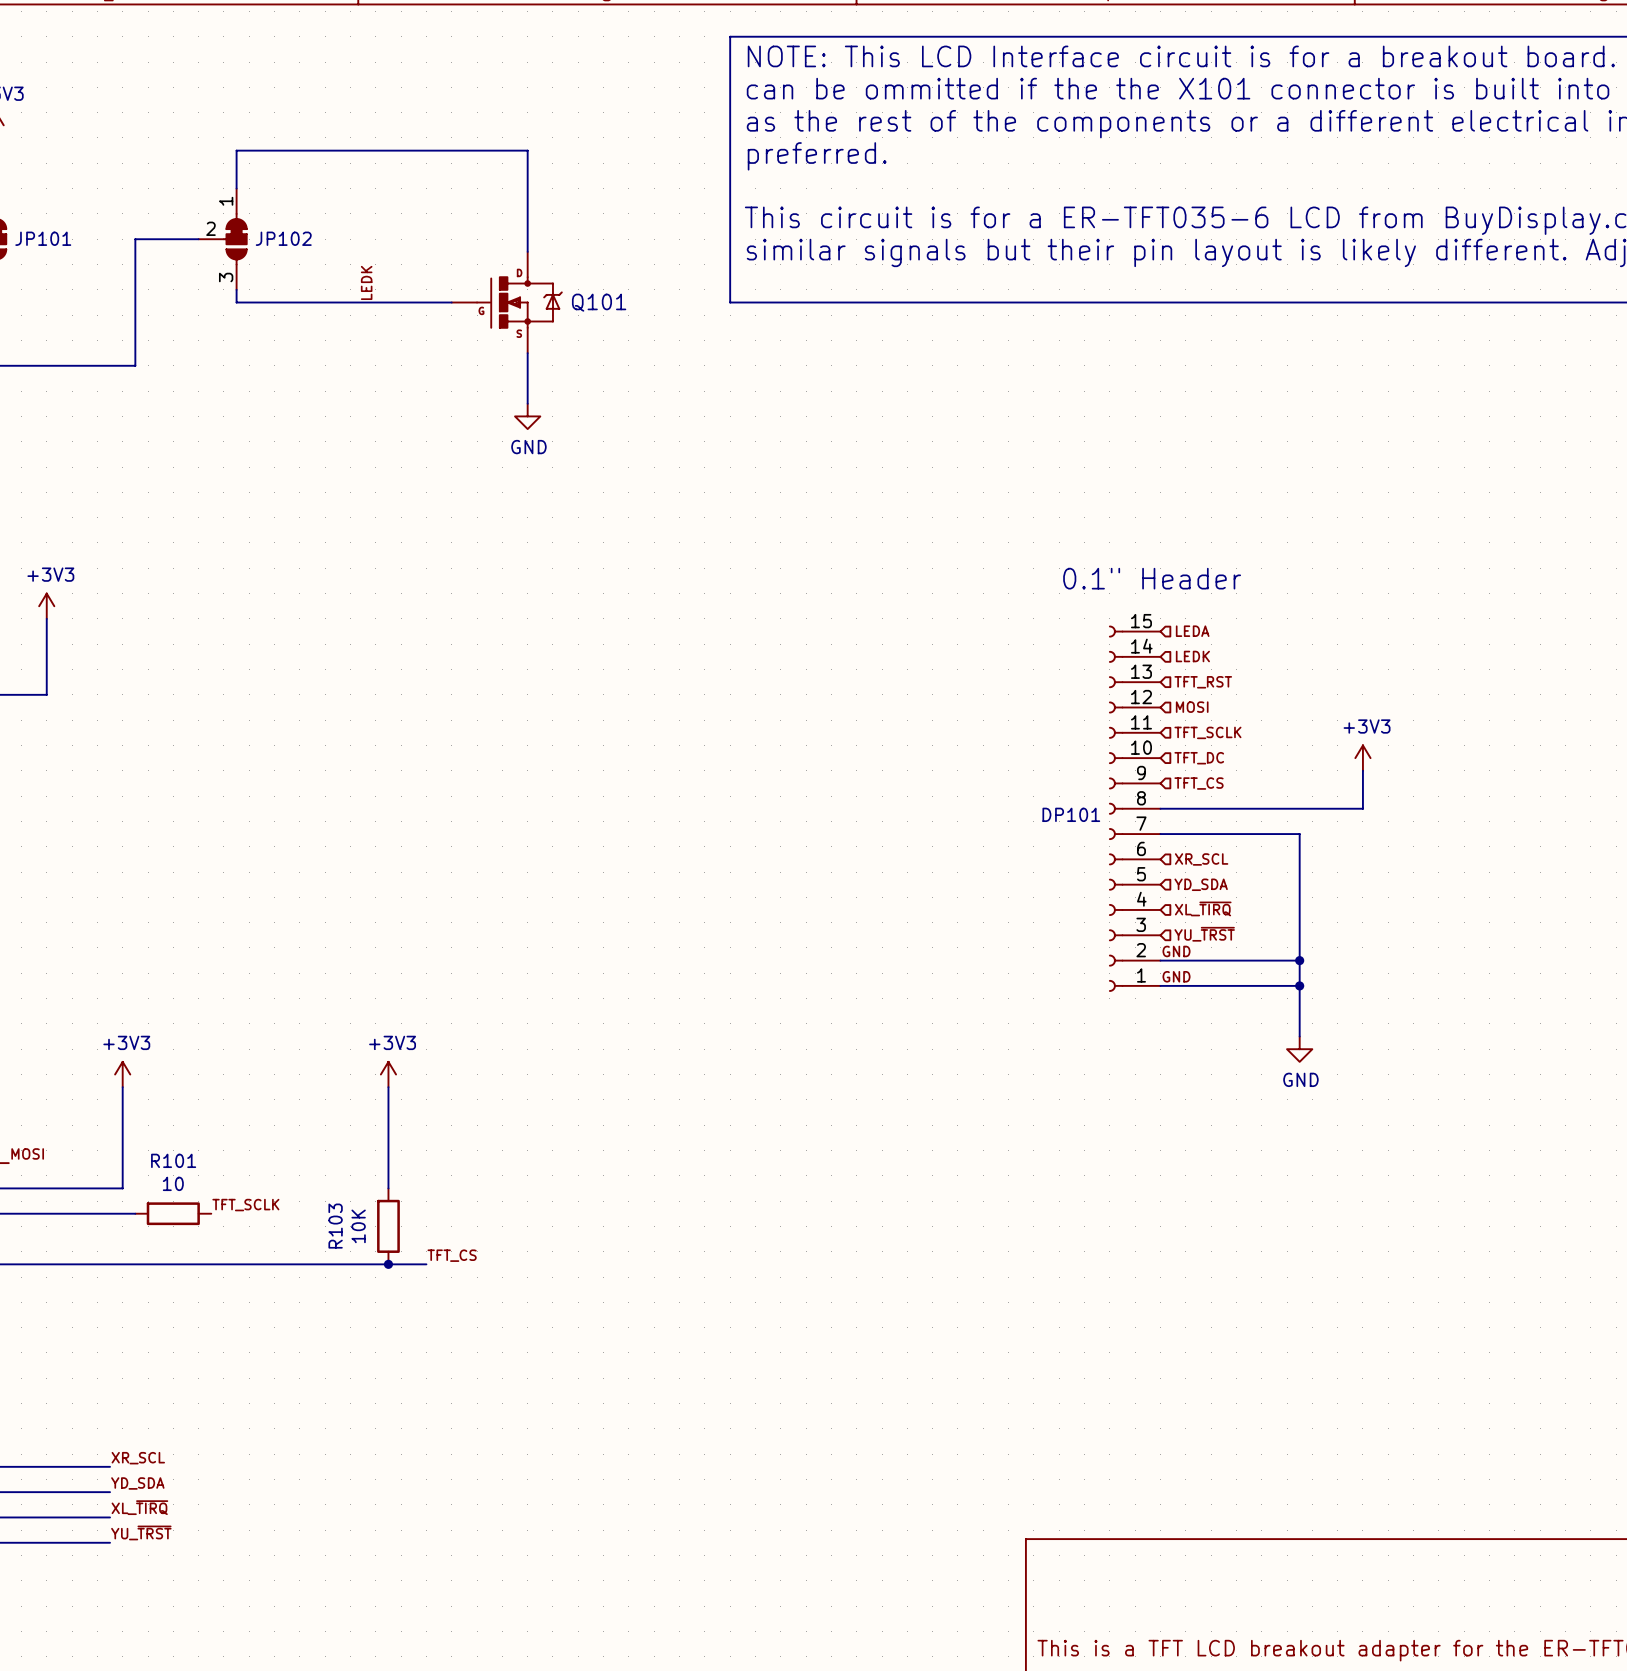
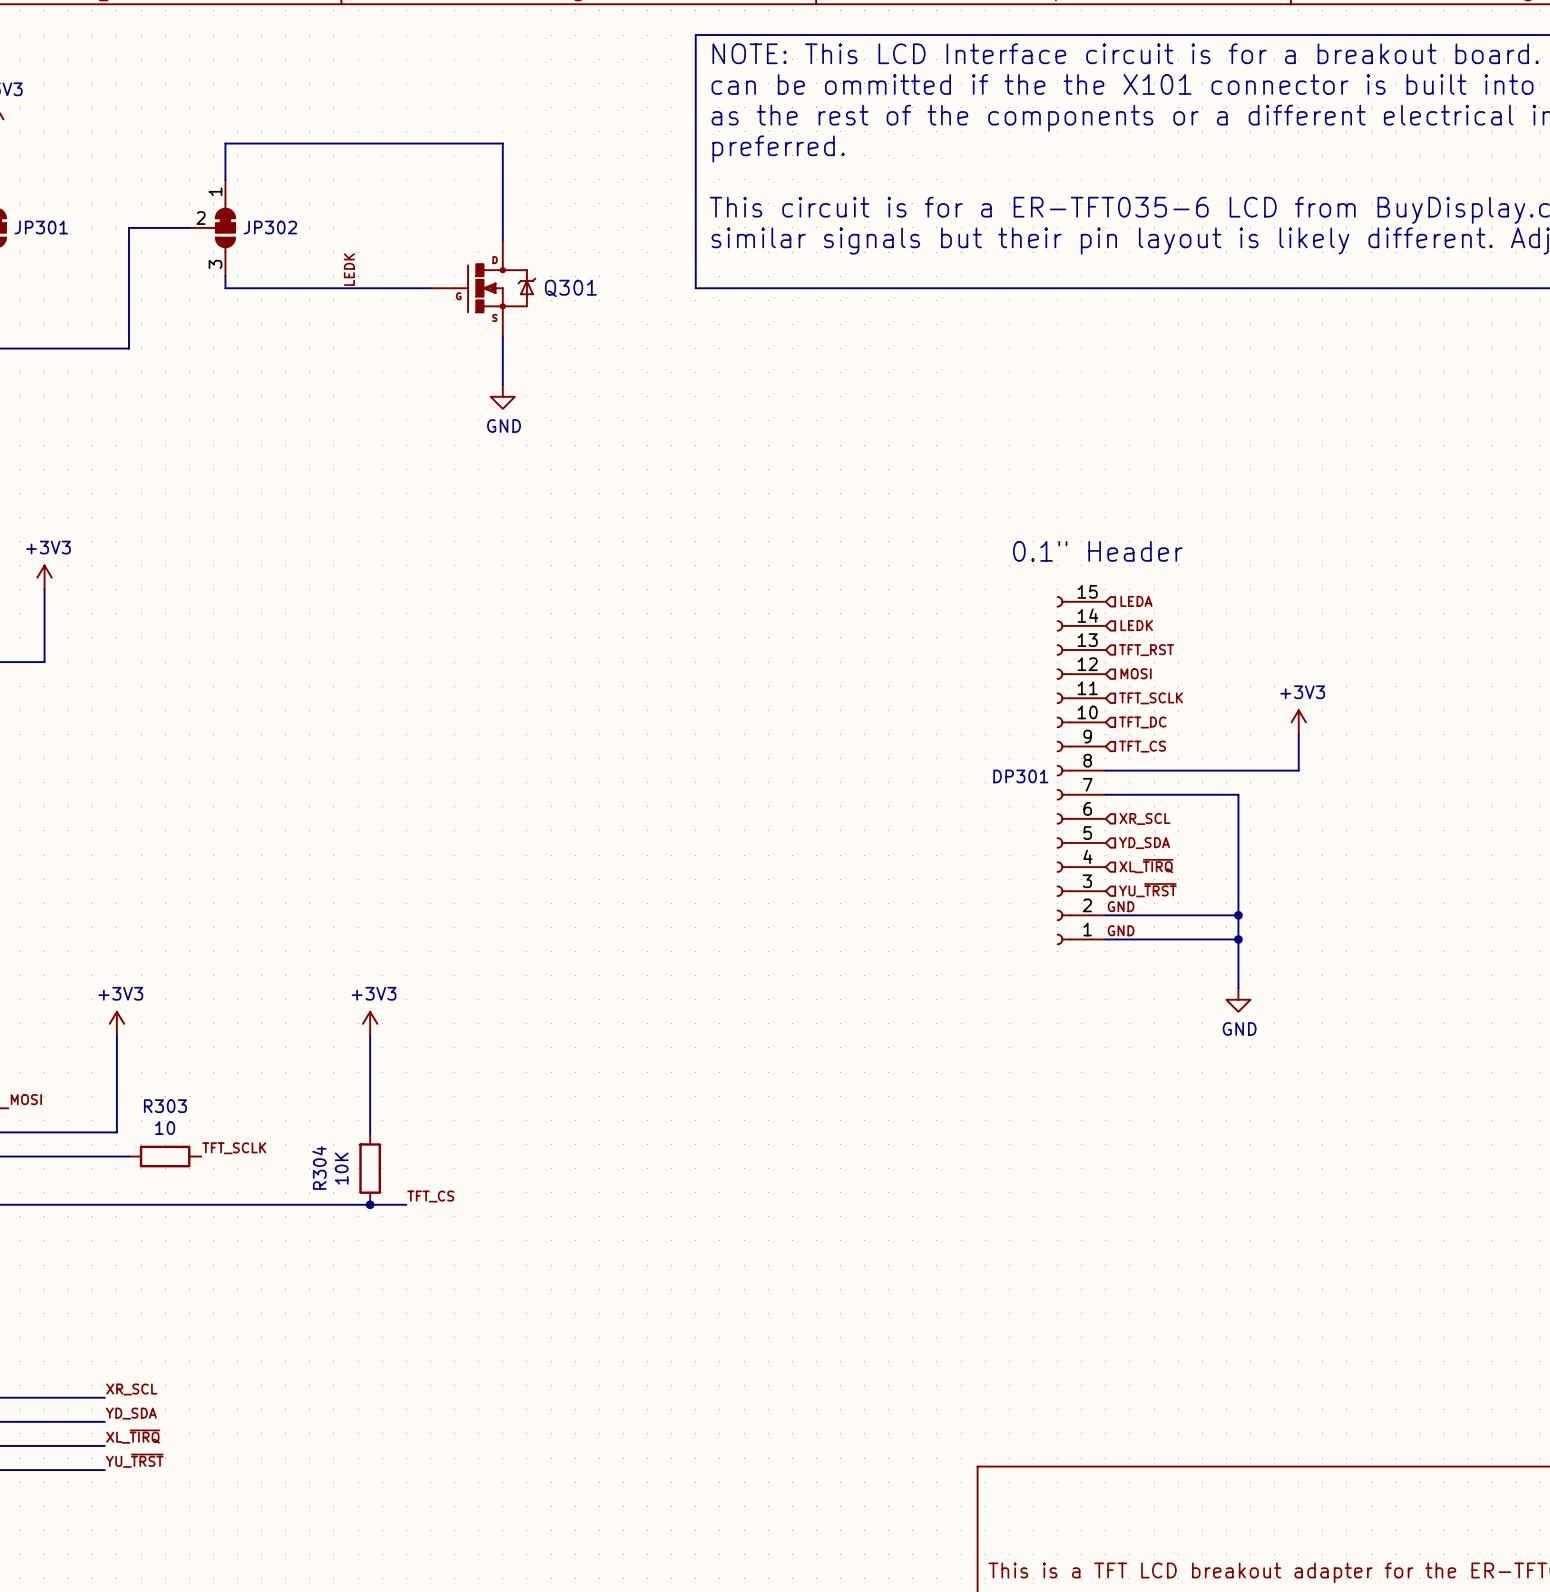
JP101 name: JP101 (43, 238) -> JP301 (41, 227)
JP102 name: JP102 (283, 238) -> JP302 (270, 227)
Q101 name: Q101 (599, 302) -> Q301 (570, 288)
DP101 name: DP101 (1071, 814) -> DP301 (1020, 776)
R101 name: R101 (173, 1160) -> R303 (165, 1106)
R103 name: R103 (335, 1226) -> R304 (319, 1168)

